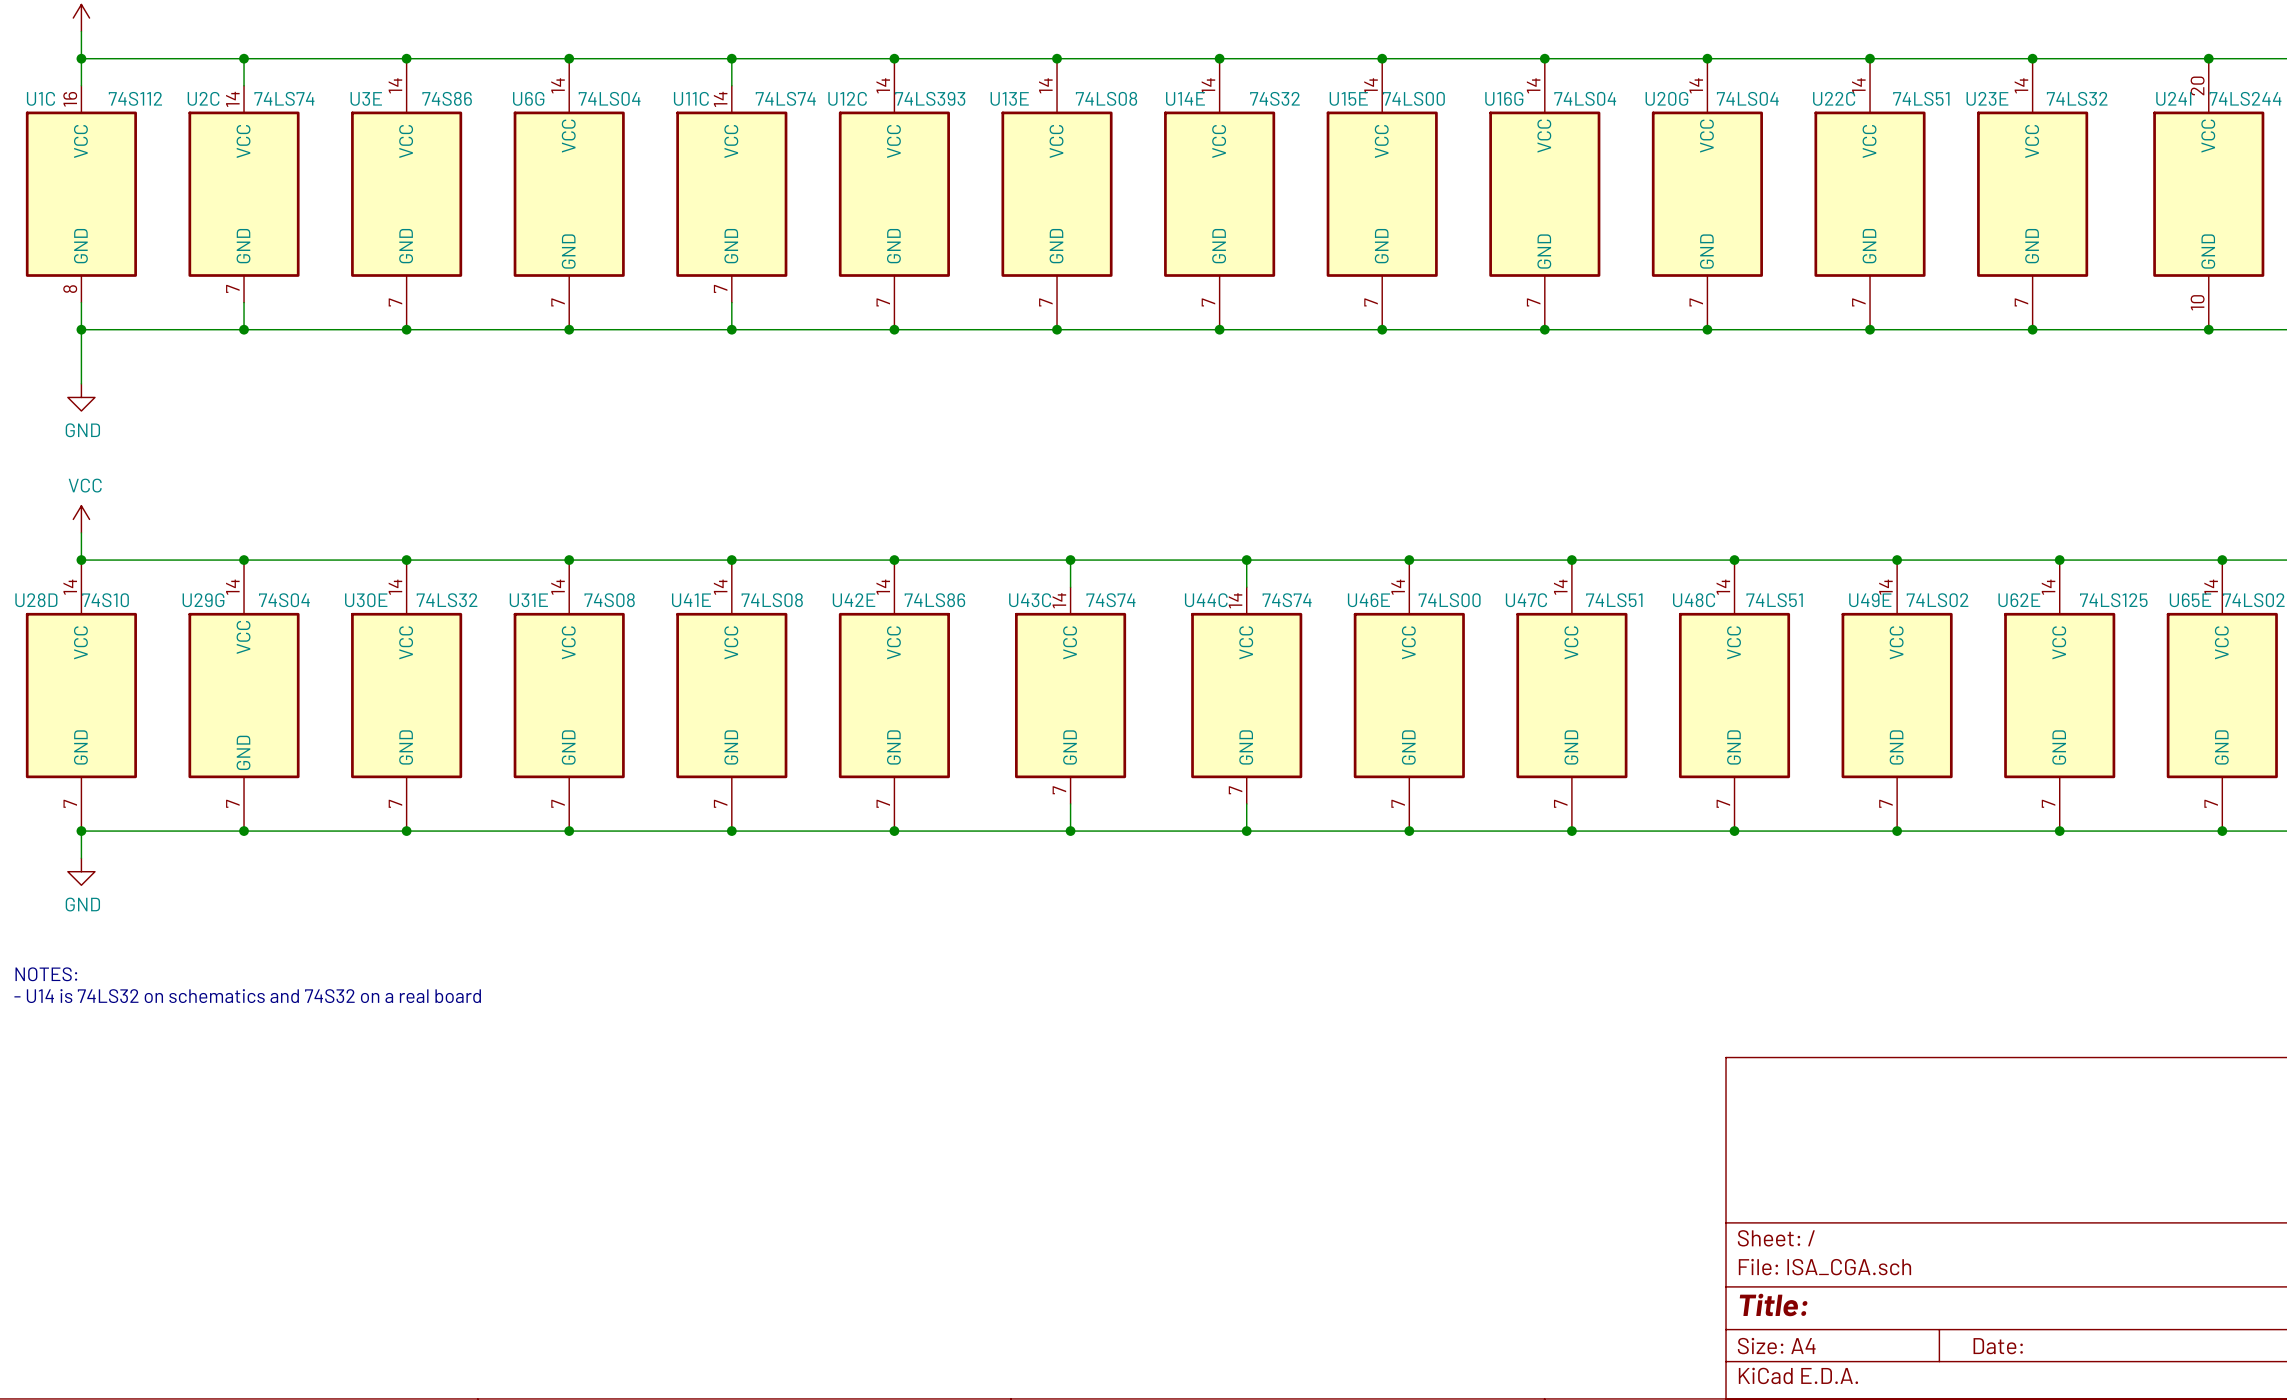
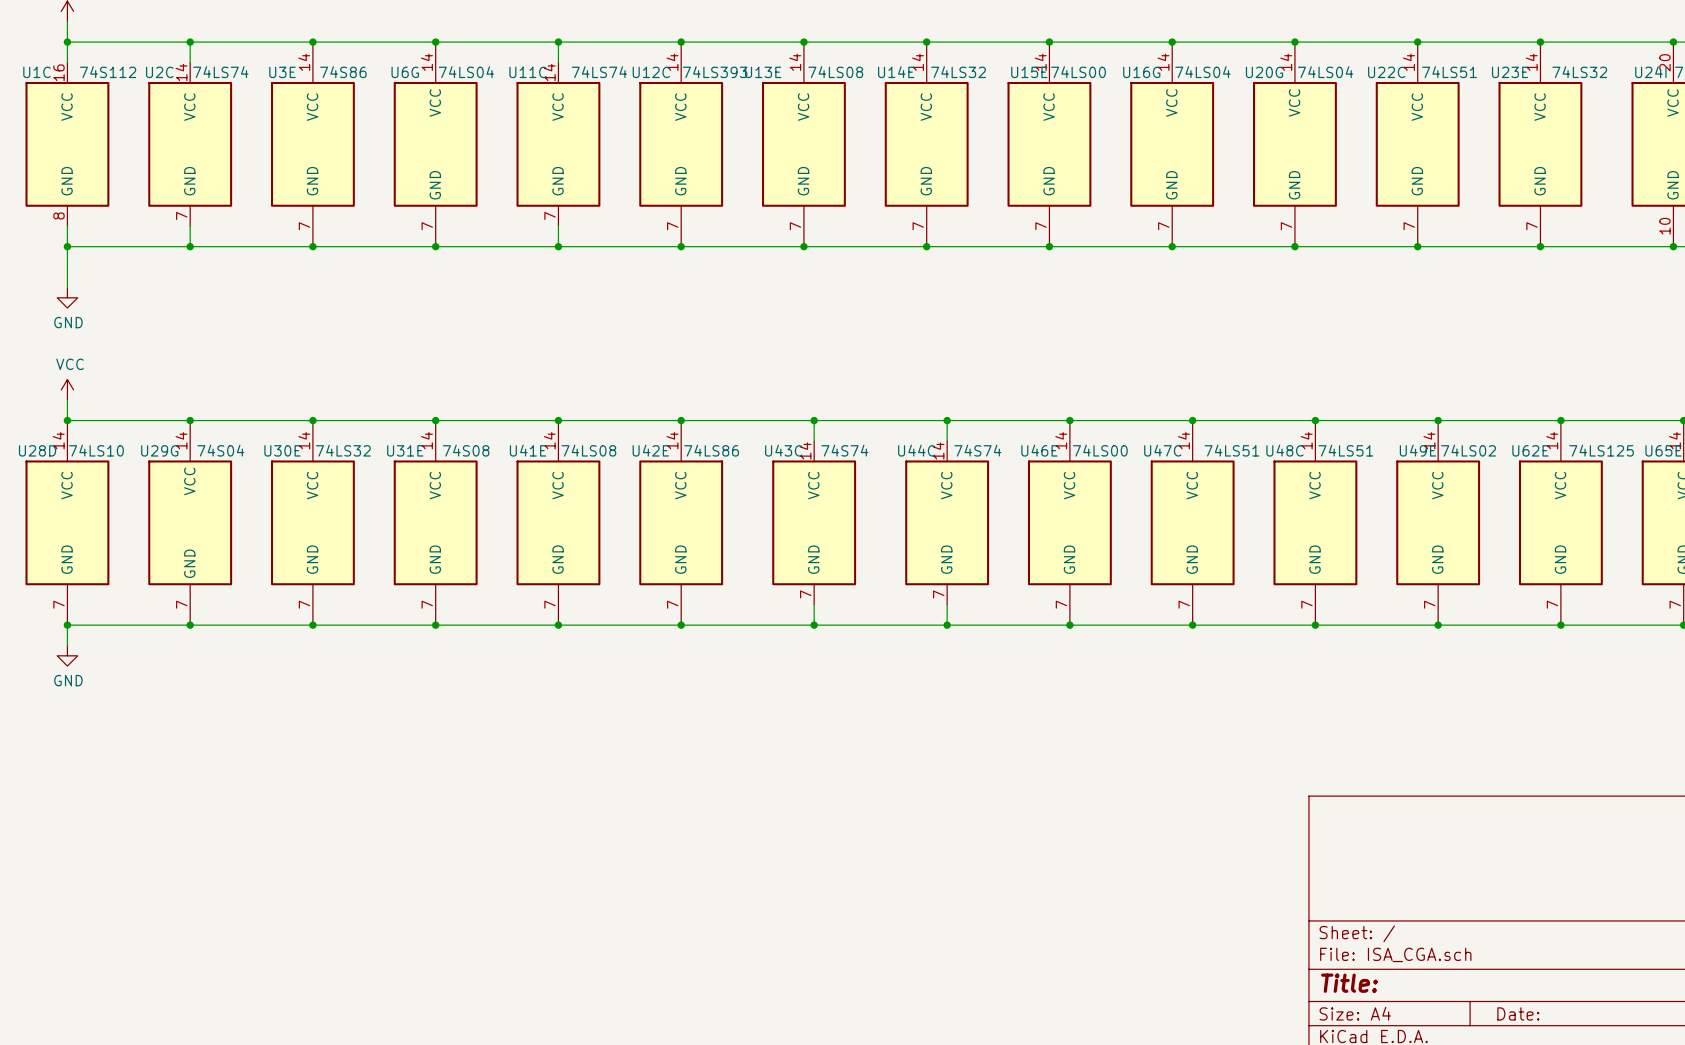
U14E value: 74S32 (1274, 98) -> 74LS32 (958, 72)
U28D value: 74S10 (105, 600) -> 74LS10 (96, 450)
text: NOTES: (46, 974) -> none
text: - U14 is 74LS32 on schematics and 74S32 on a real board (247, 996) -> none

